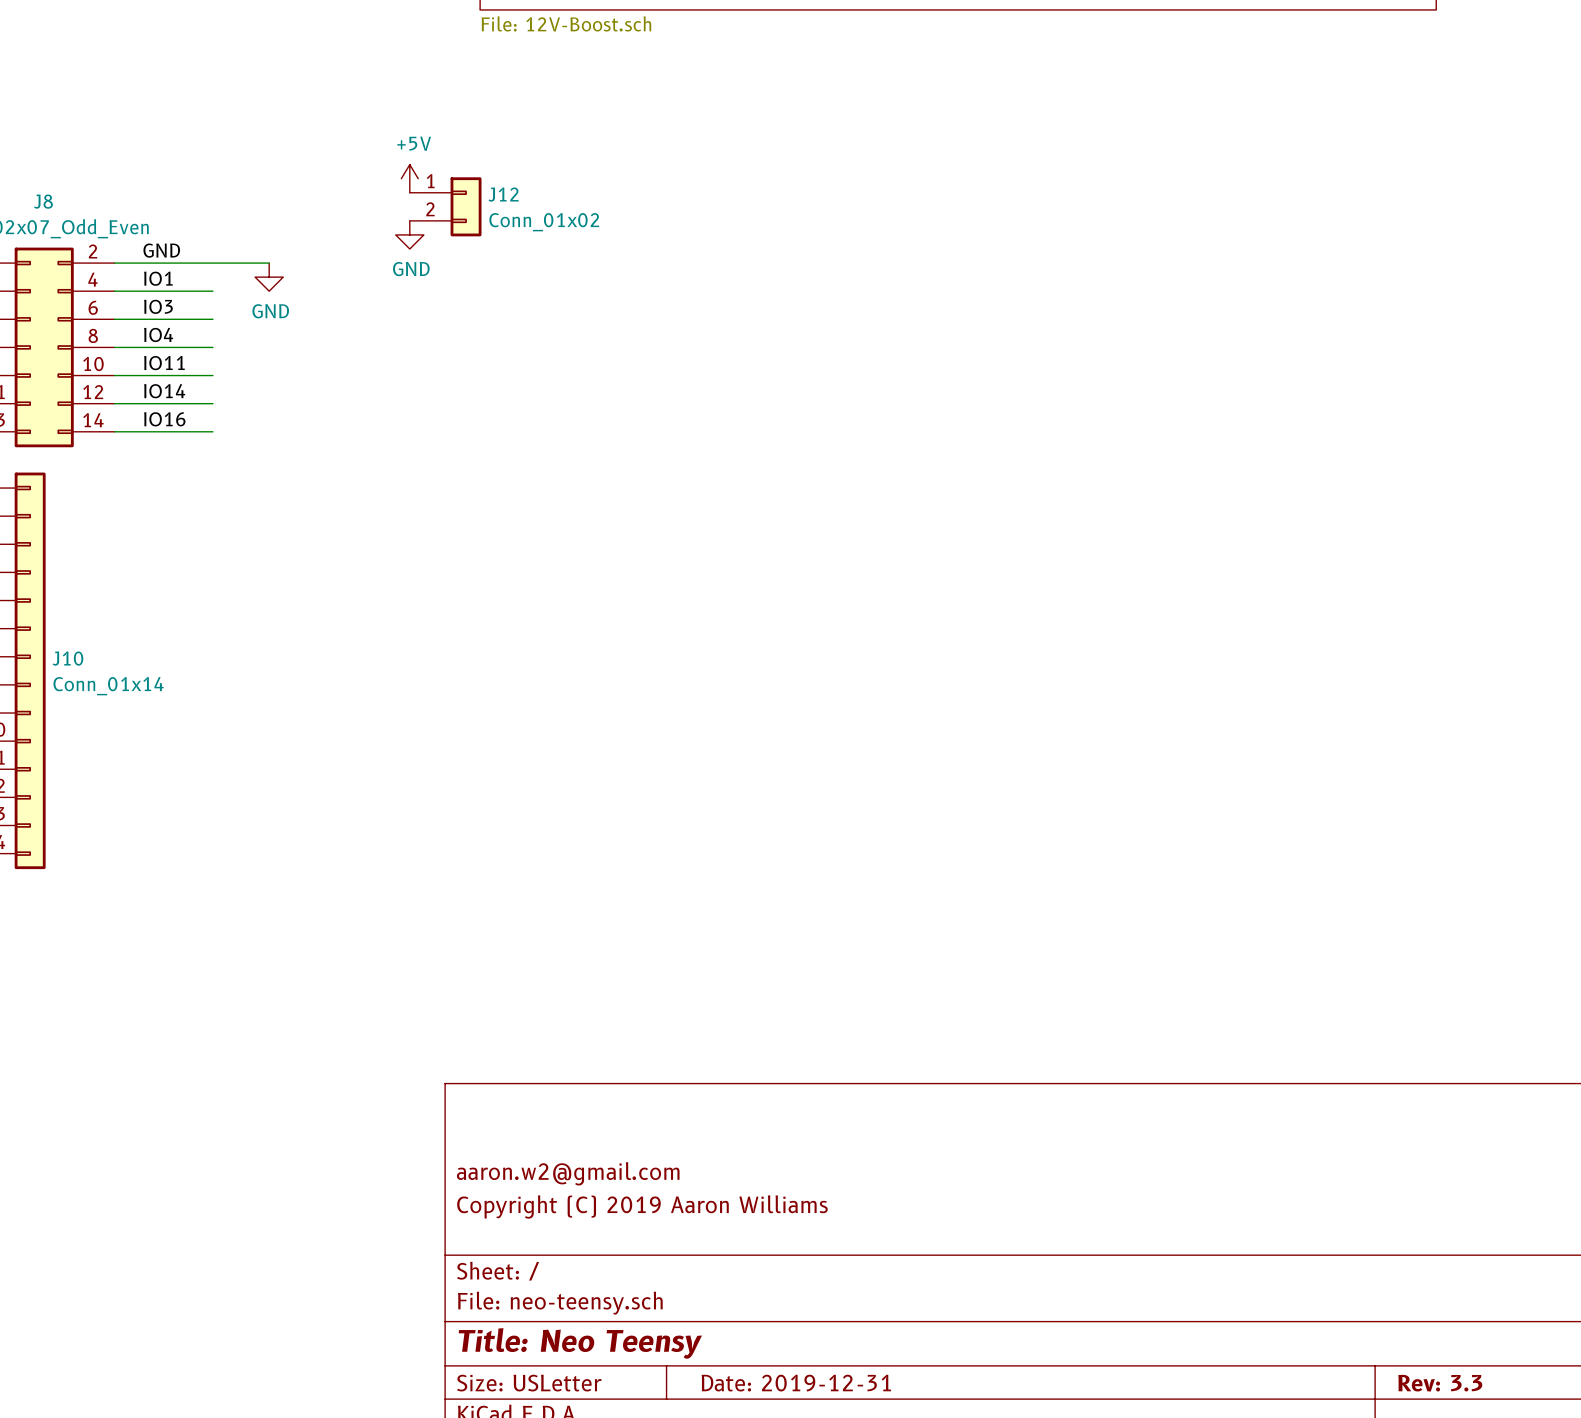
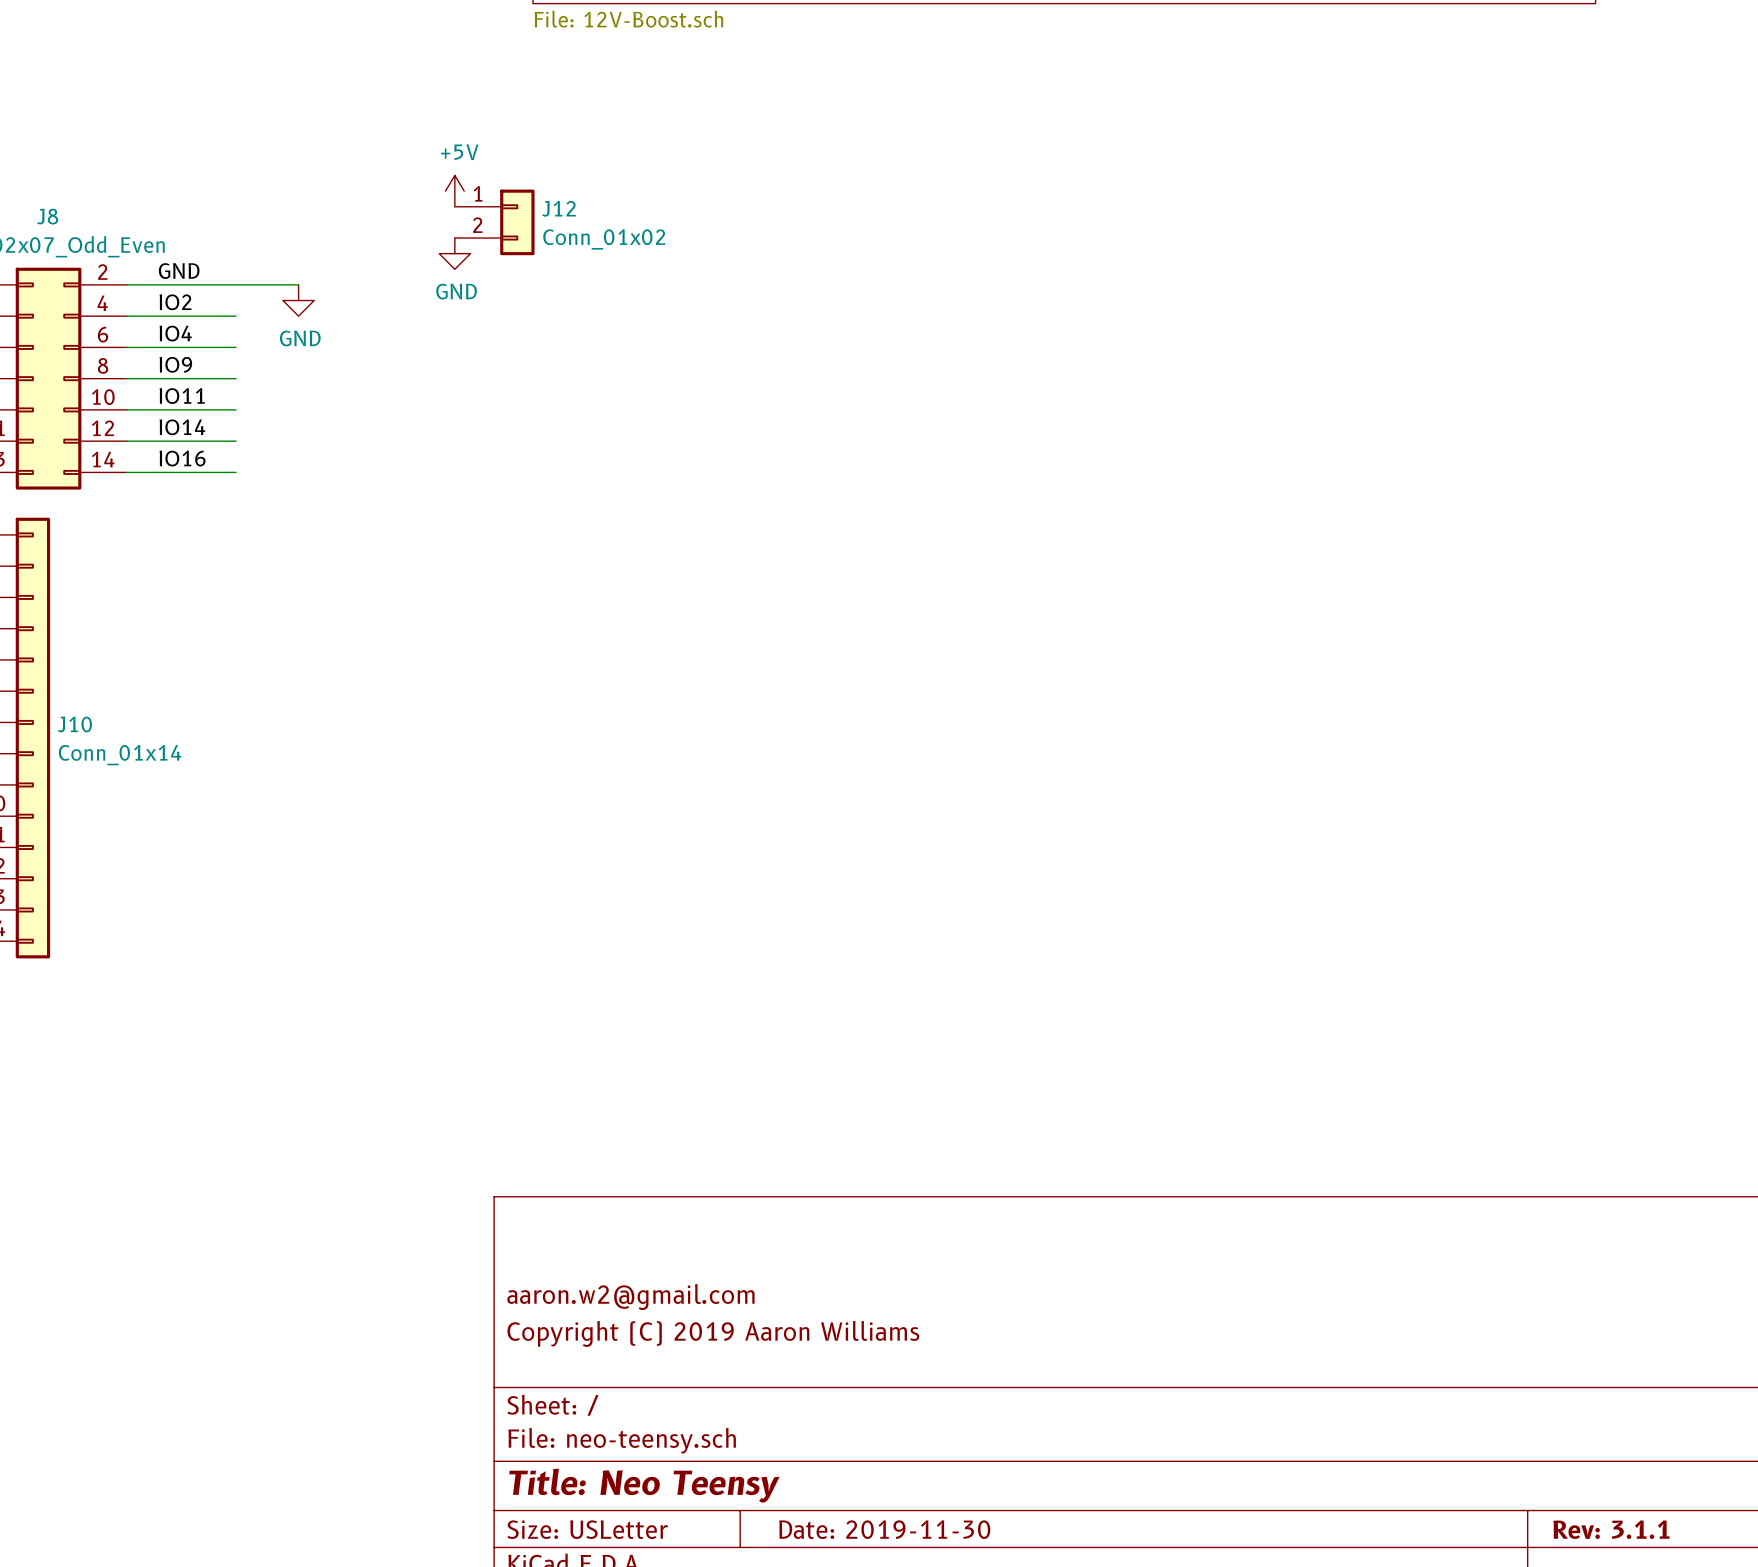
label: IO1 (158, 278) -> IO2 (175, 302)
label: IO3 (158, 306) -> IO4 (175, 333)
label: IO4 (158, 334) -> IO9 (175, 364)
title block: Date: 2019-12-31 (796, 1383) -> Date: 2019-11-30 (884, 1529)
title block: Rev: 3.3 (1440, 1383) -> Rev: 3.1.1 (1611, 1529)

